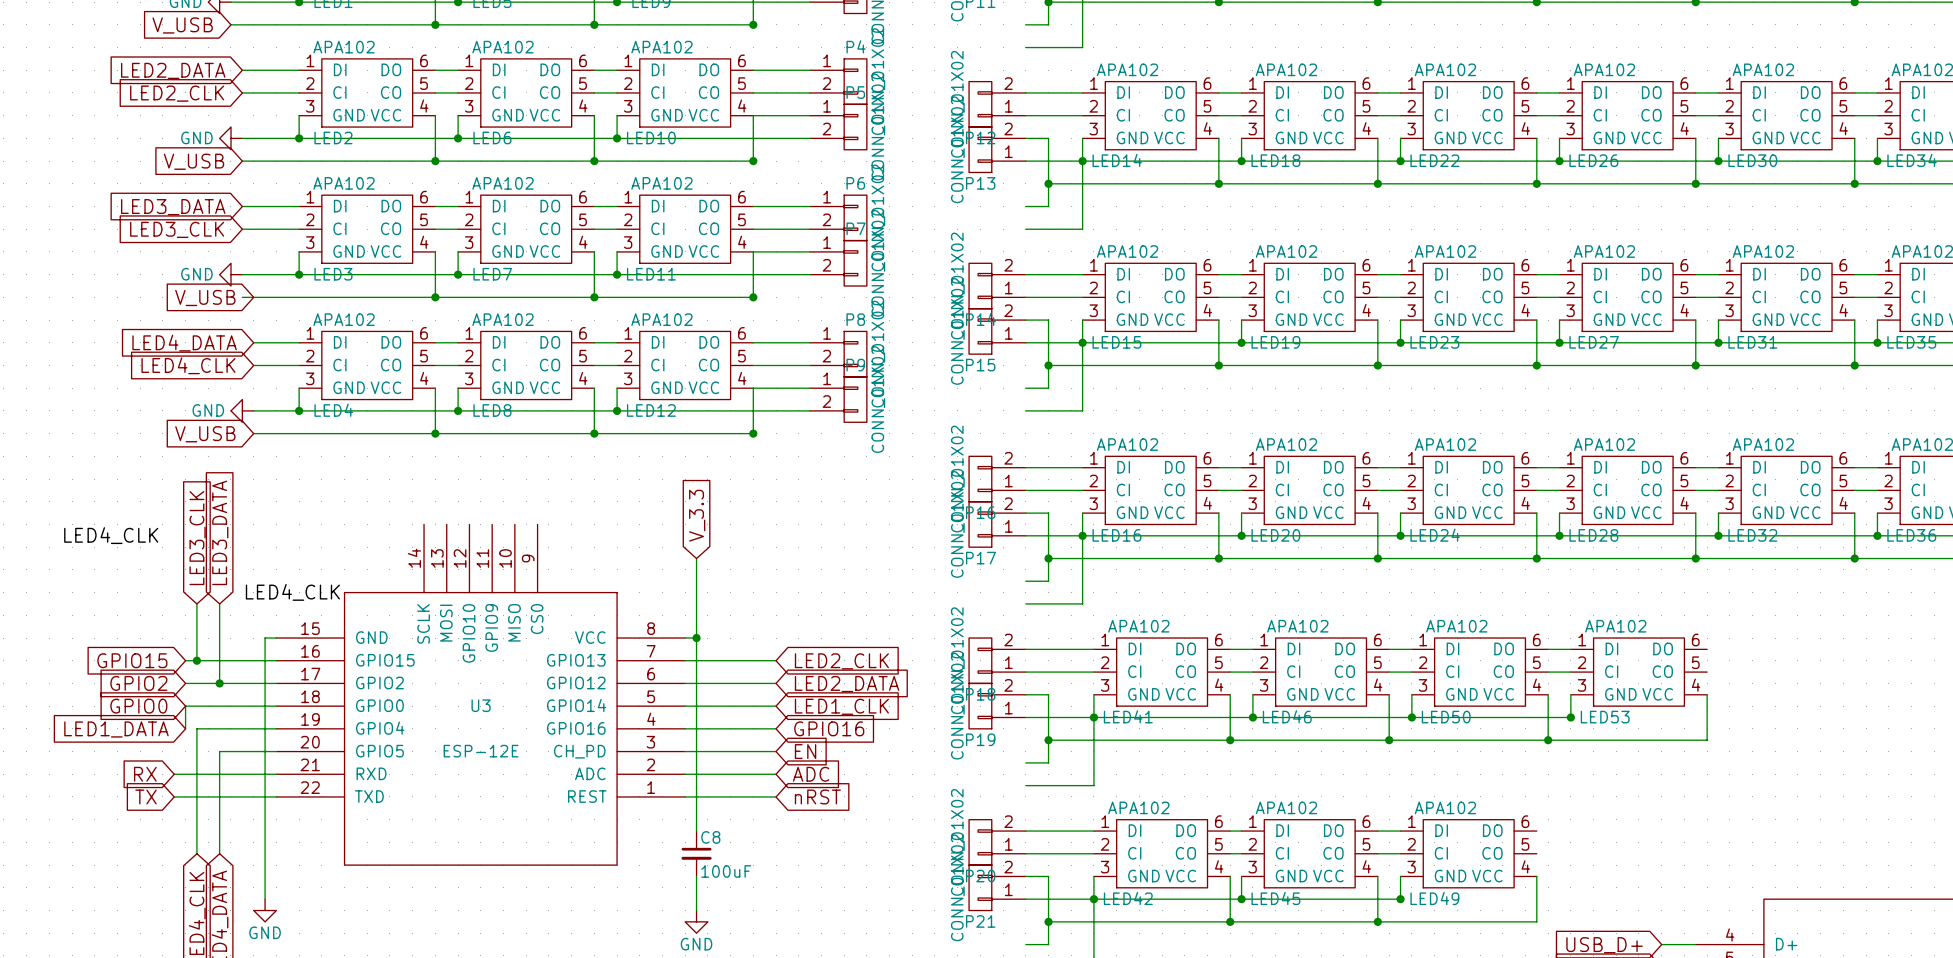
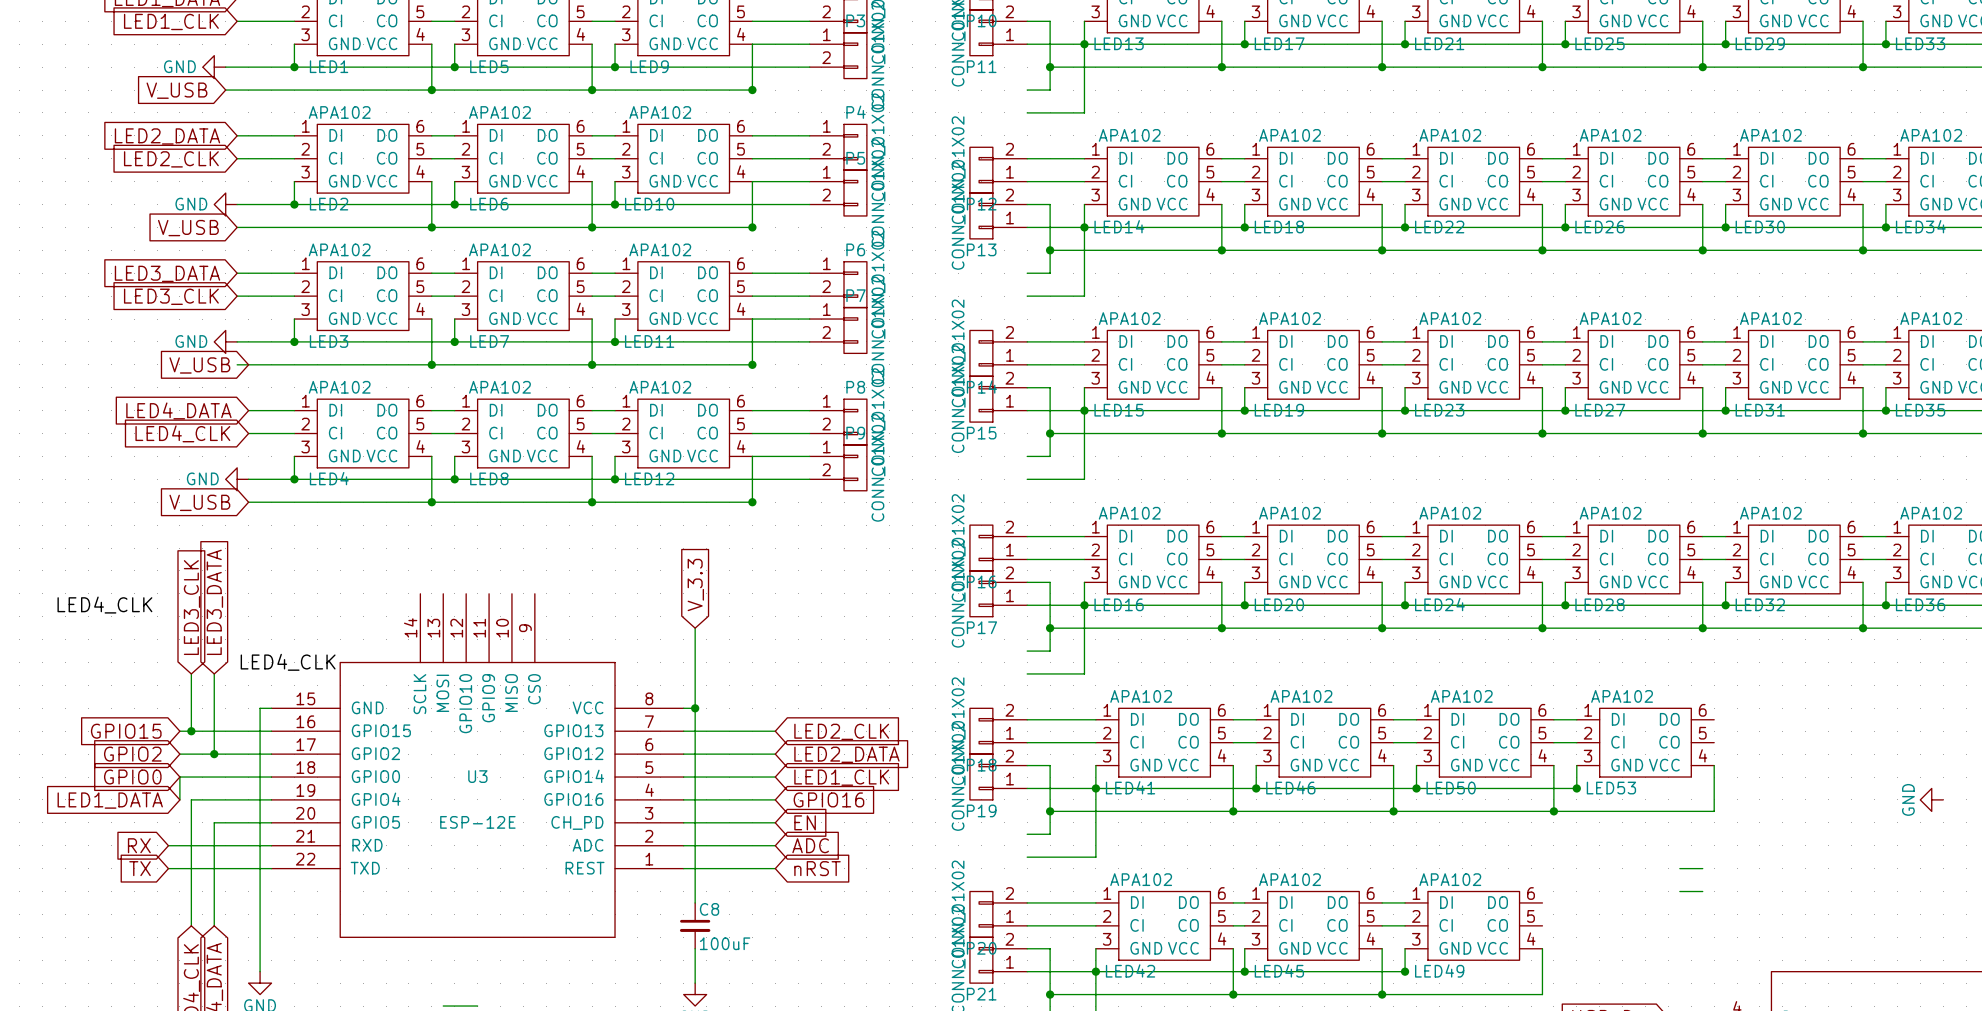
power symbol: none -> GND (1931, 799)
wire: none -> (1679, 868) (1702, 868)
wire: none -> (1679, 891) (1702, 891)
wire: none -> (443, 1006) (477, 1006)

